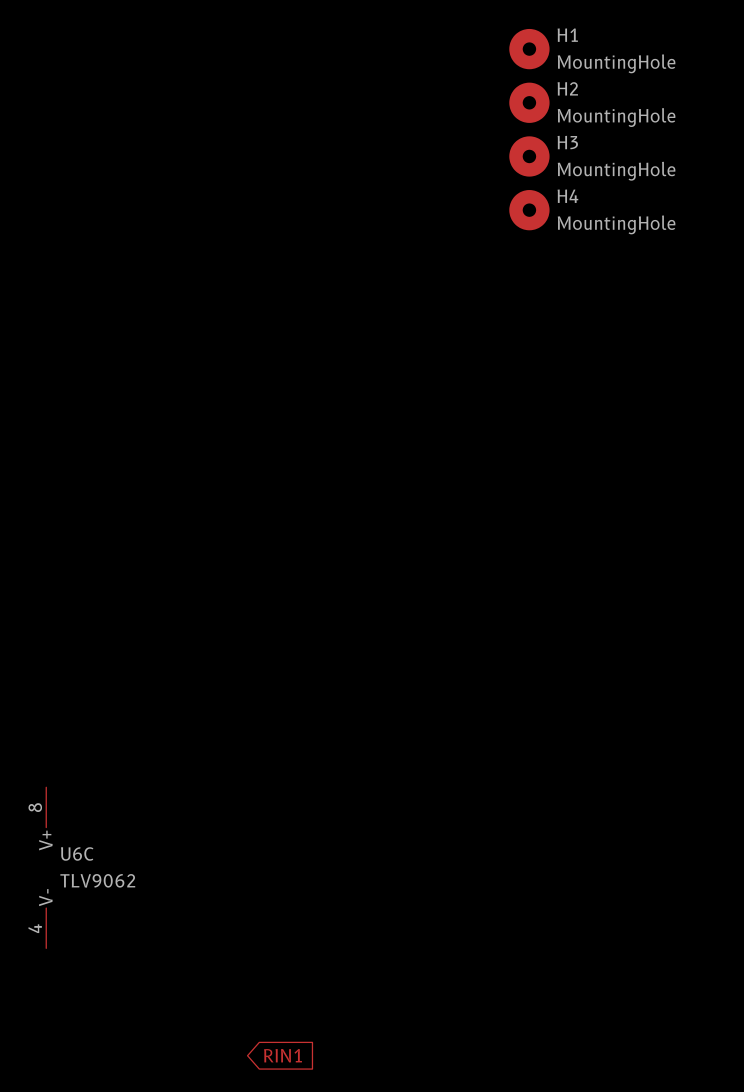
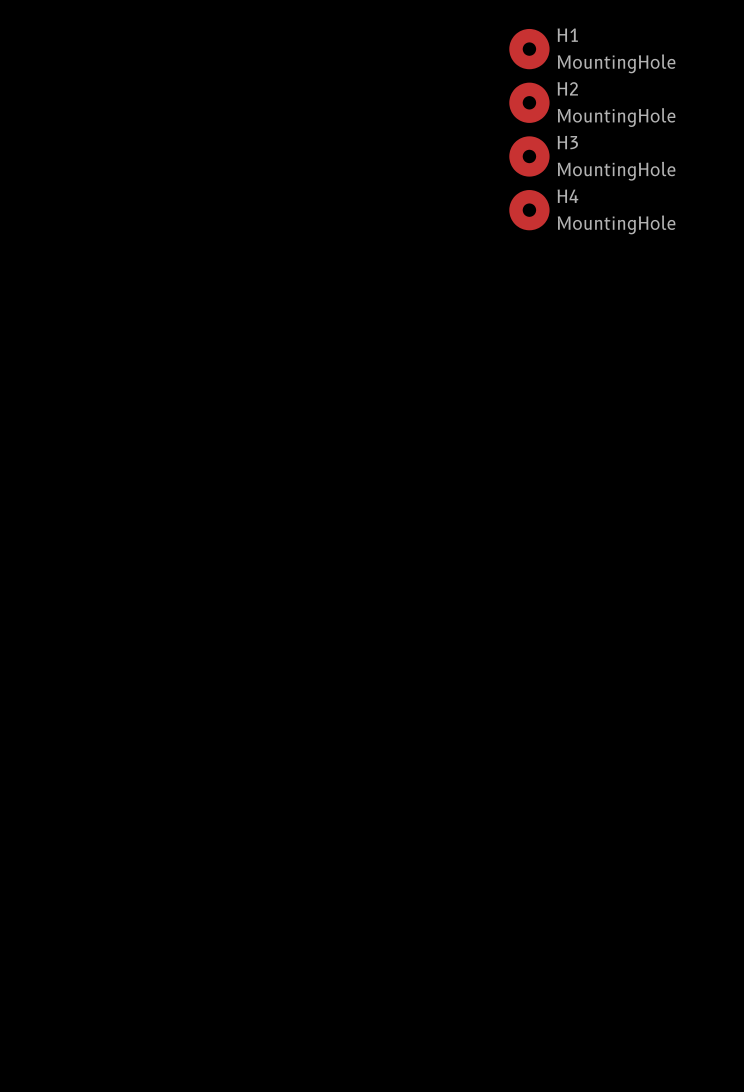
U6C: TLV9062 (46, 867) -> none
global label: RIN1 (283, 1055) -> none

